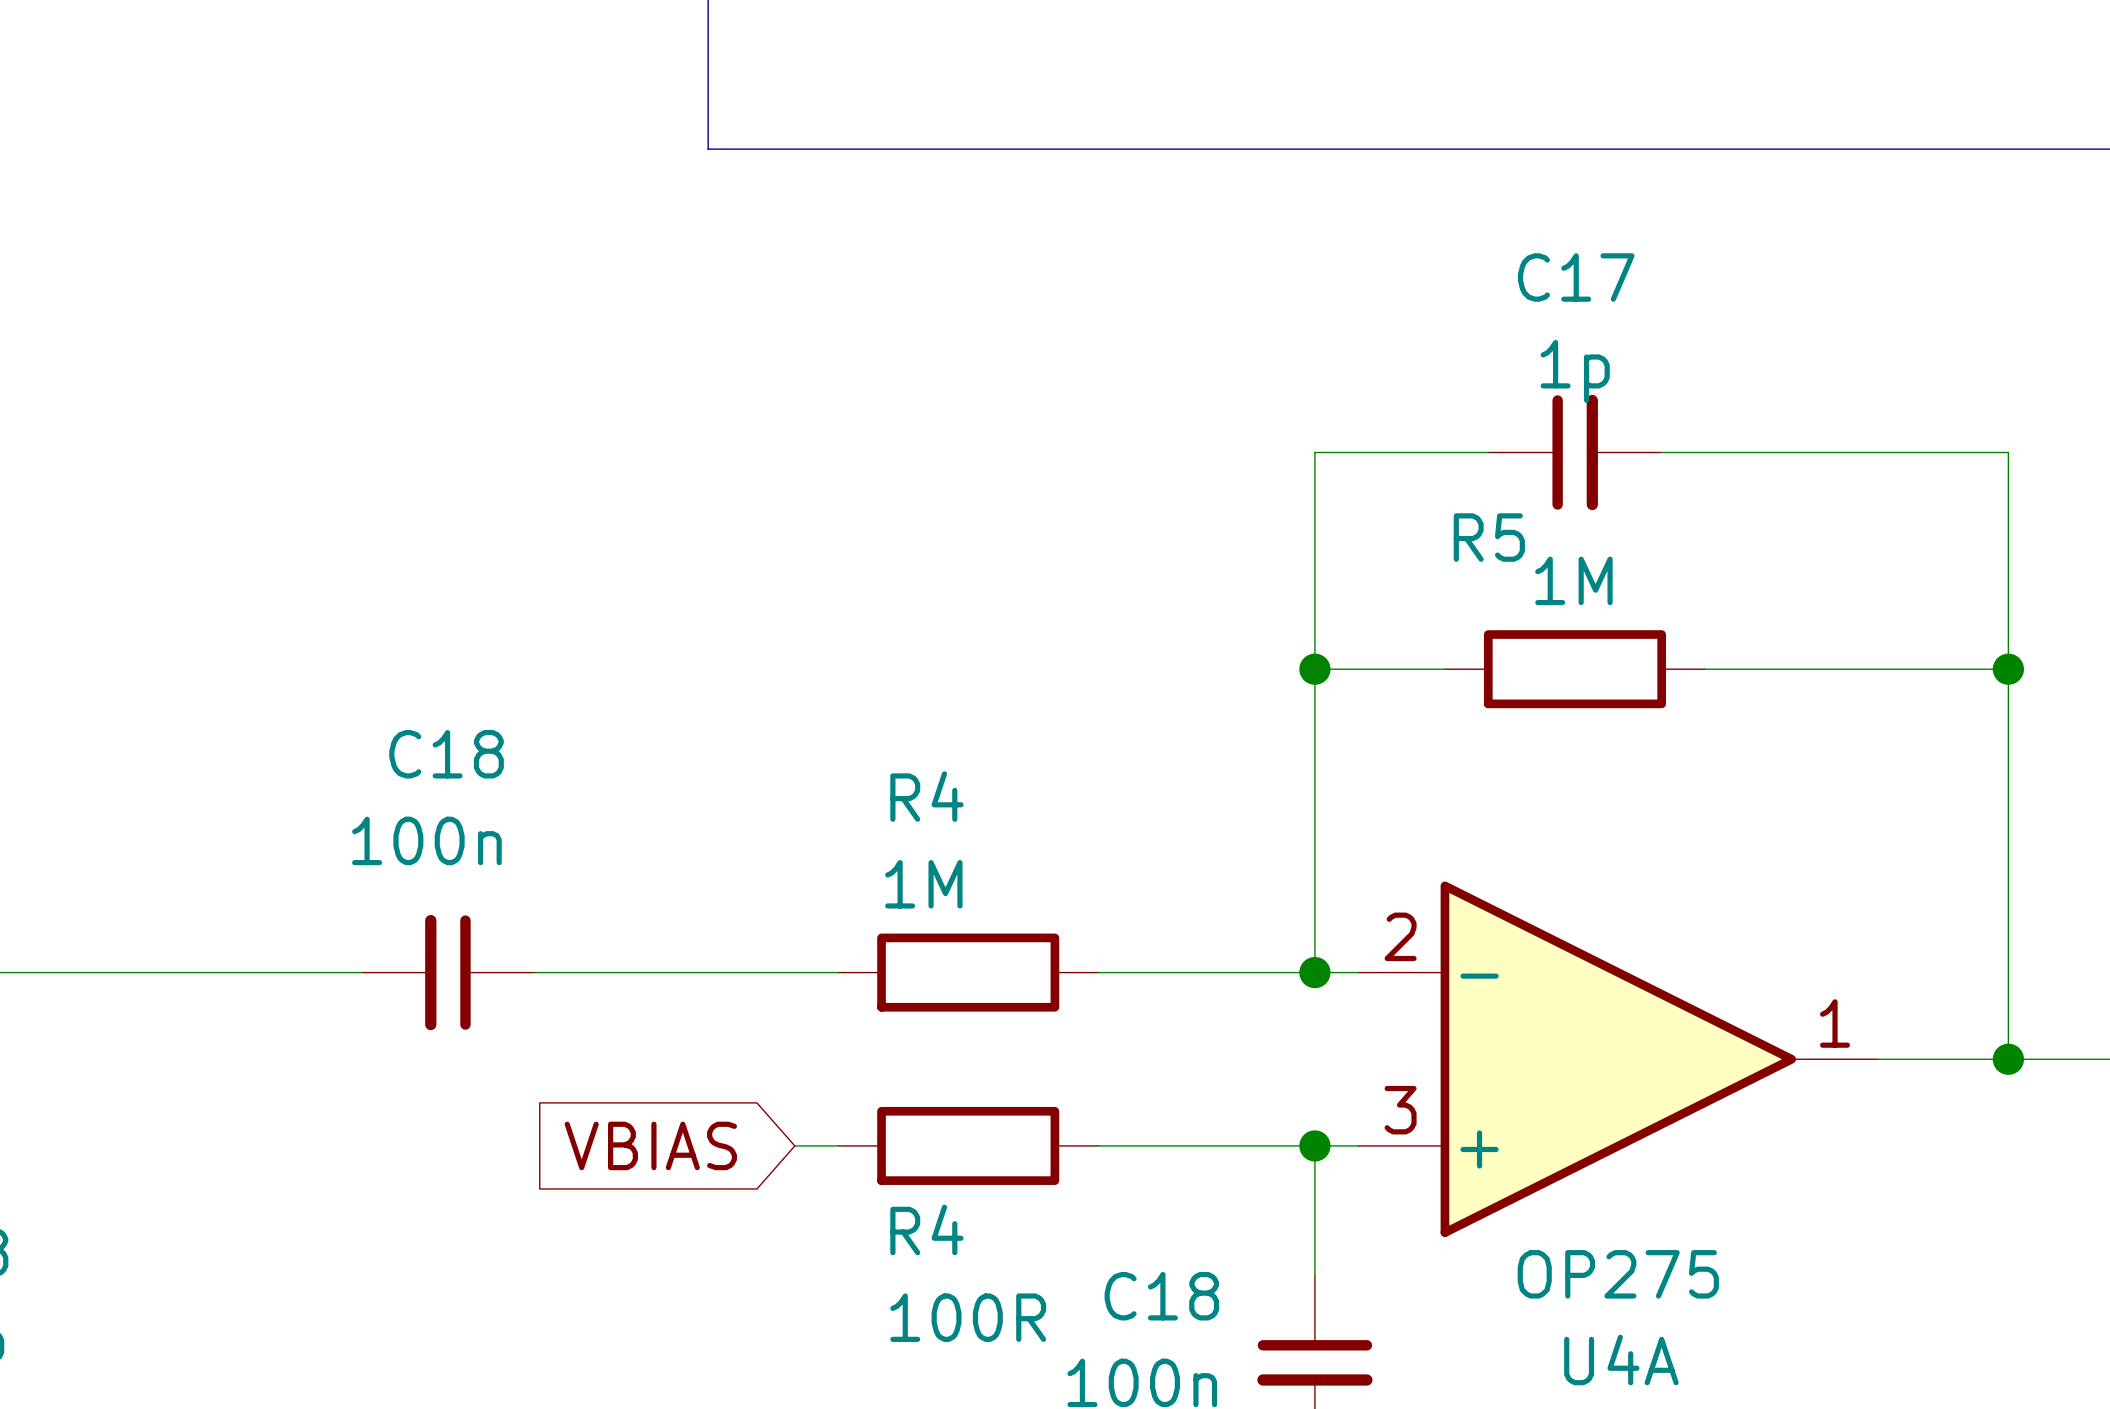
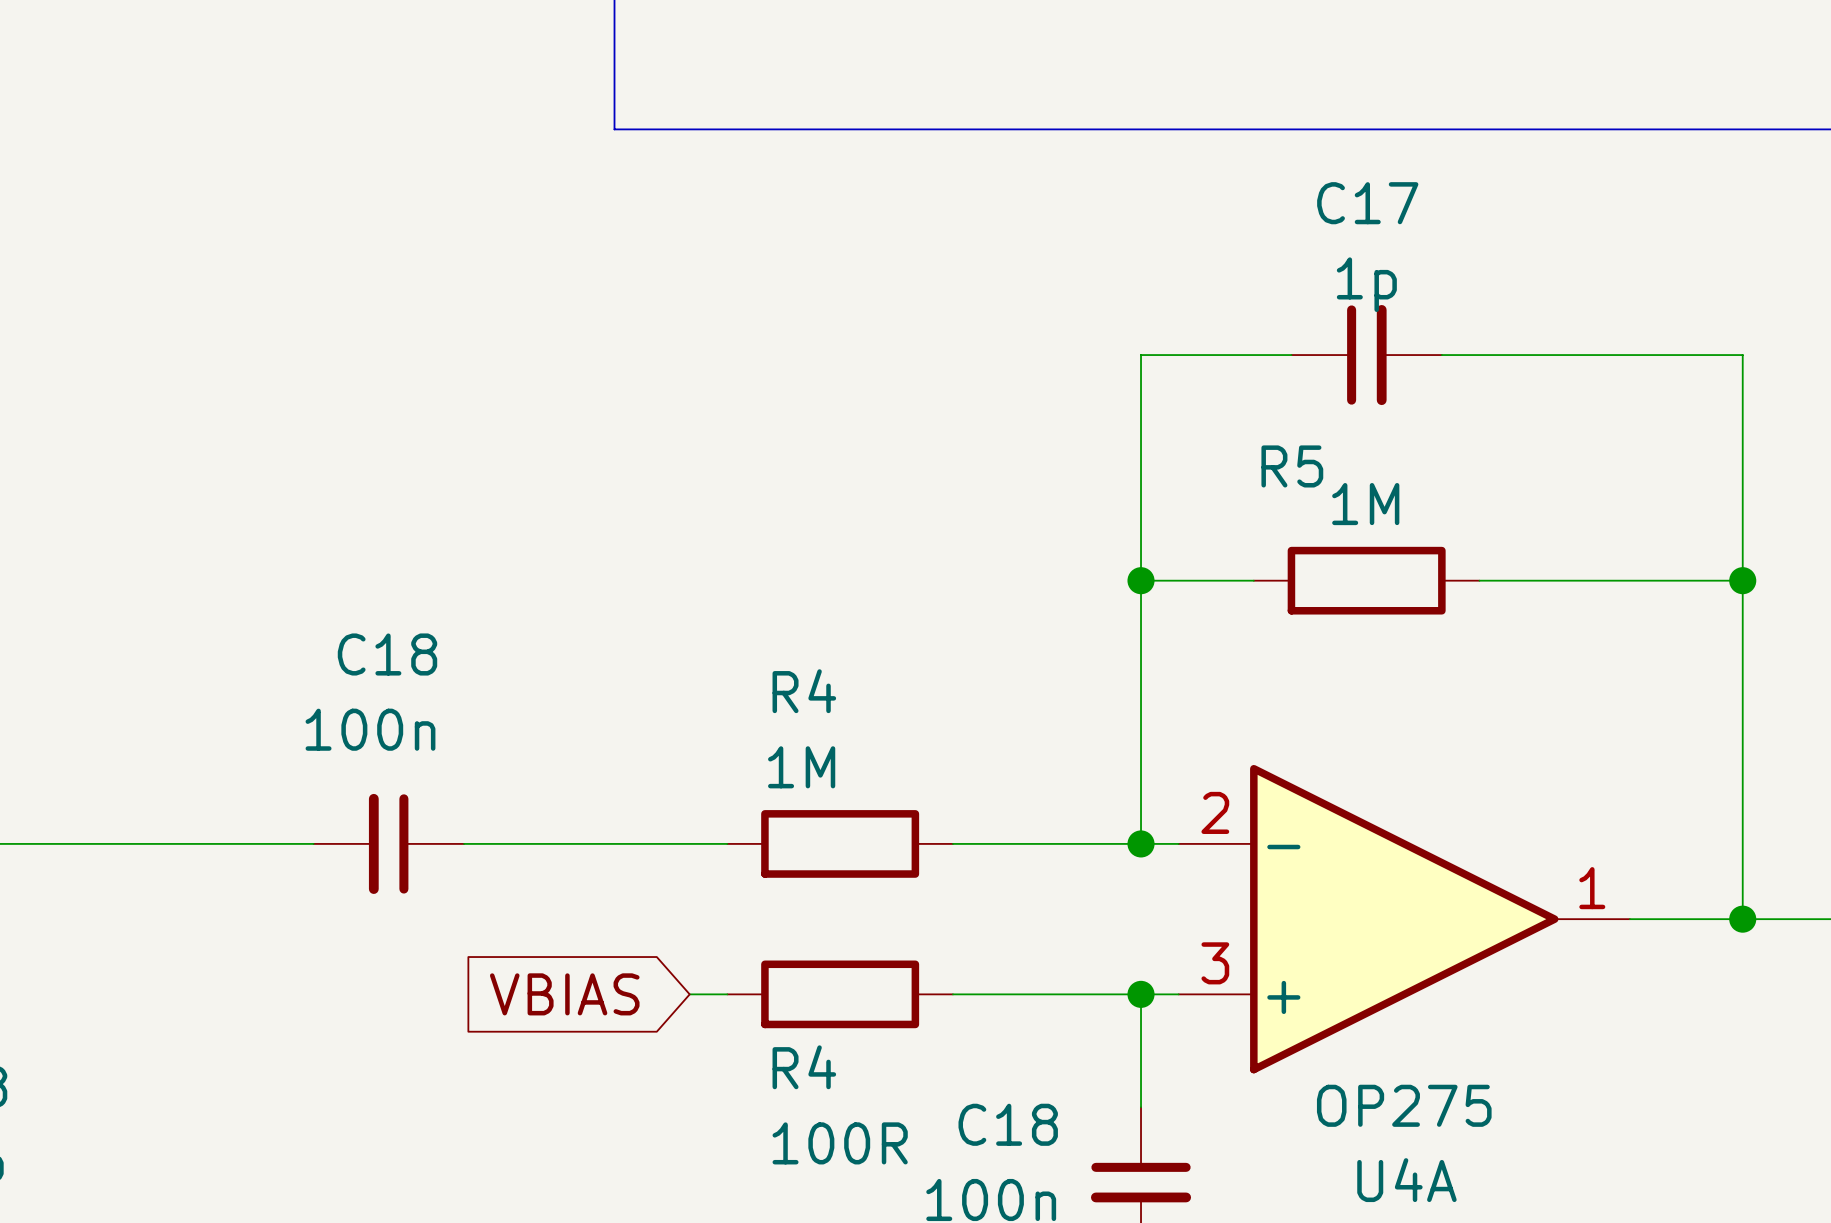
wire: (1314, 452) (1488, 452) -> (1141, 392) (1141, 355) (1291, 355)
C17 position: (1574, 452) -> (1366, 355)
wire: (1661, 452) (2008, 452) -> (1441, 355) (1742, 355) (1742, 392)

